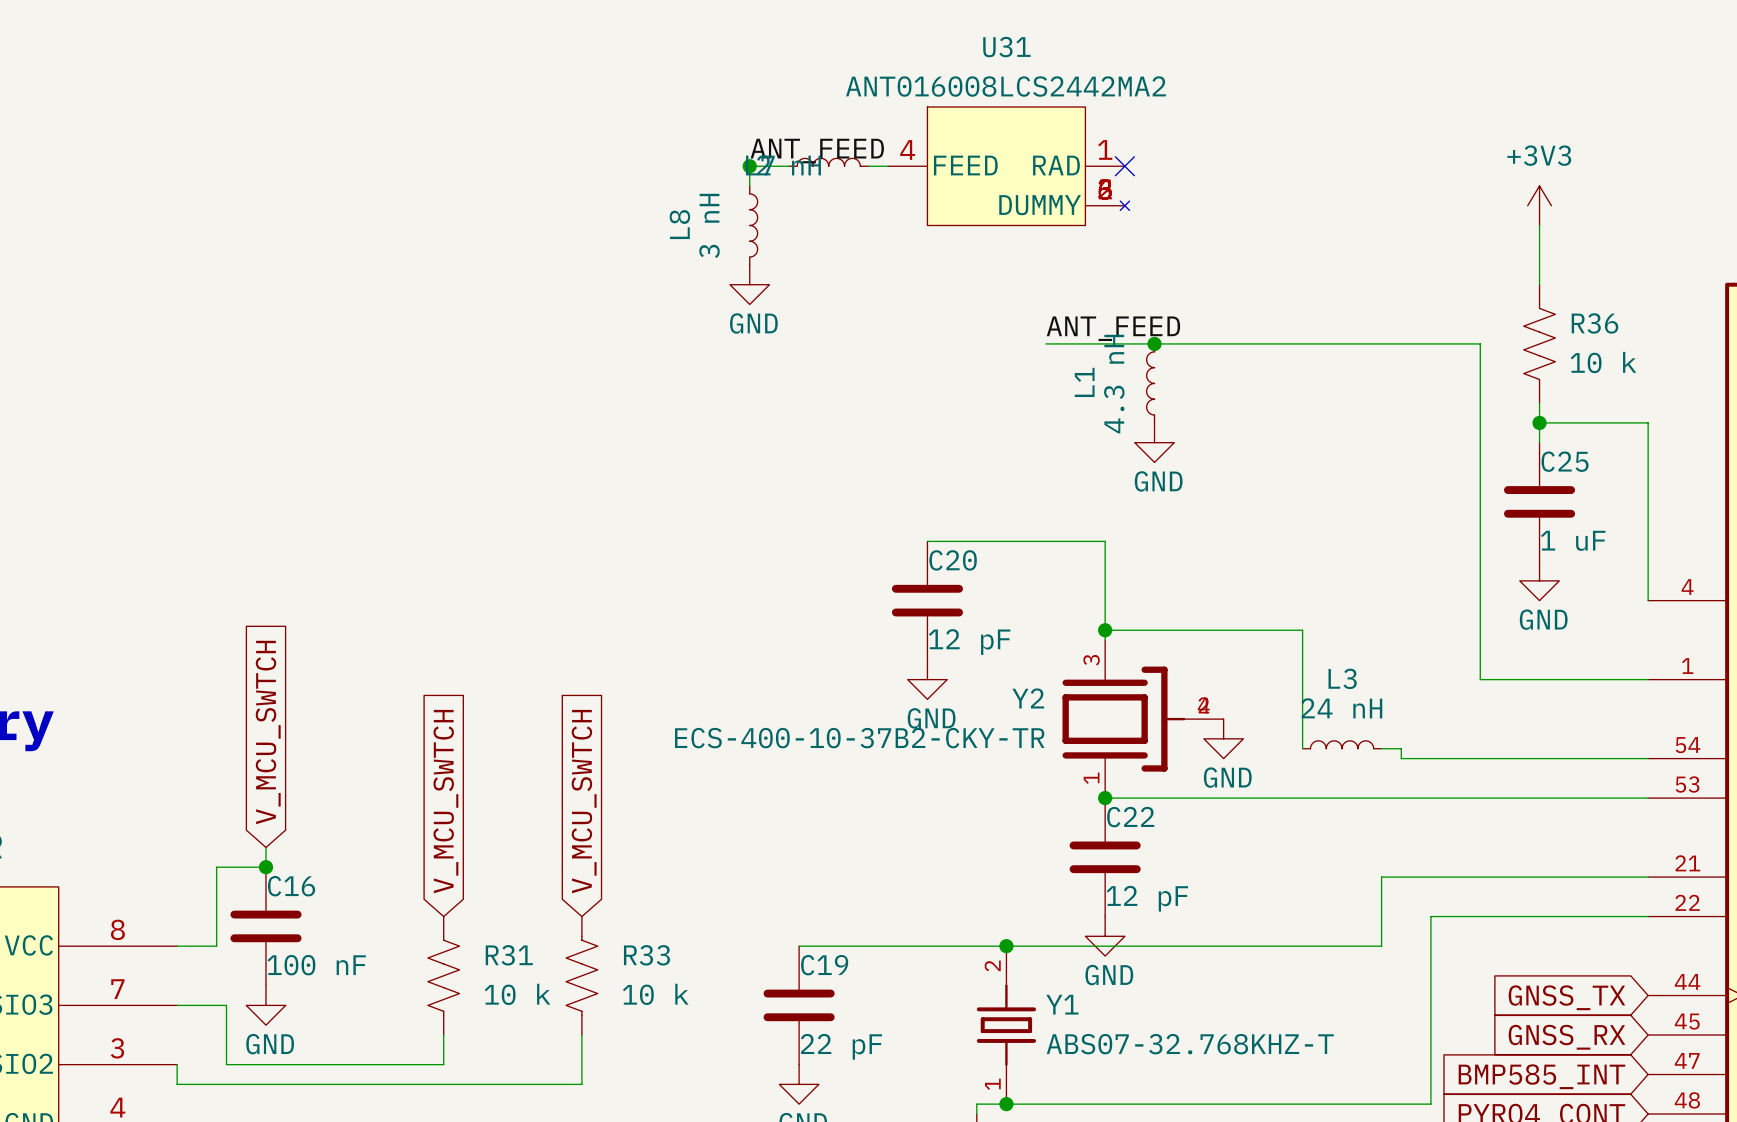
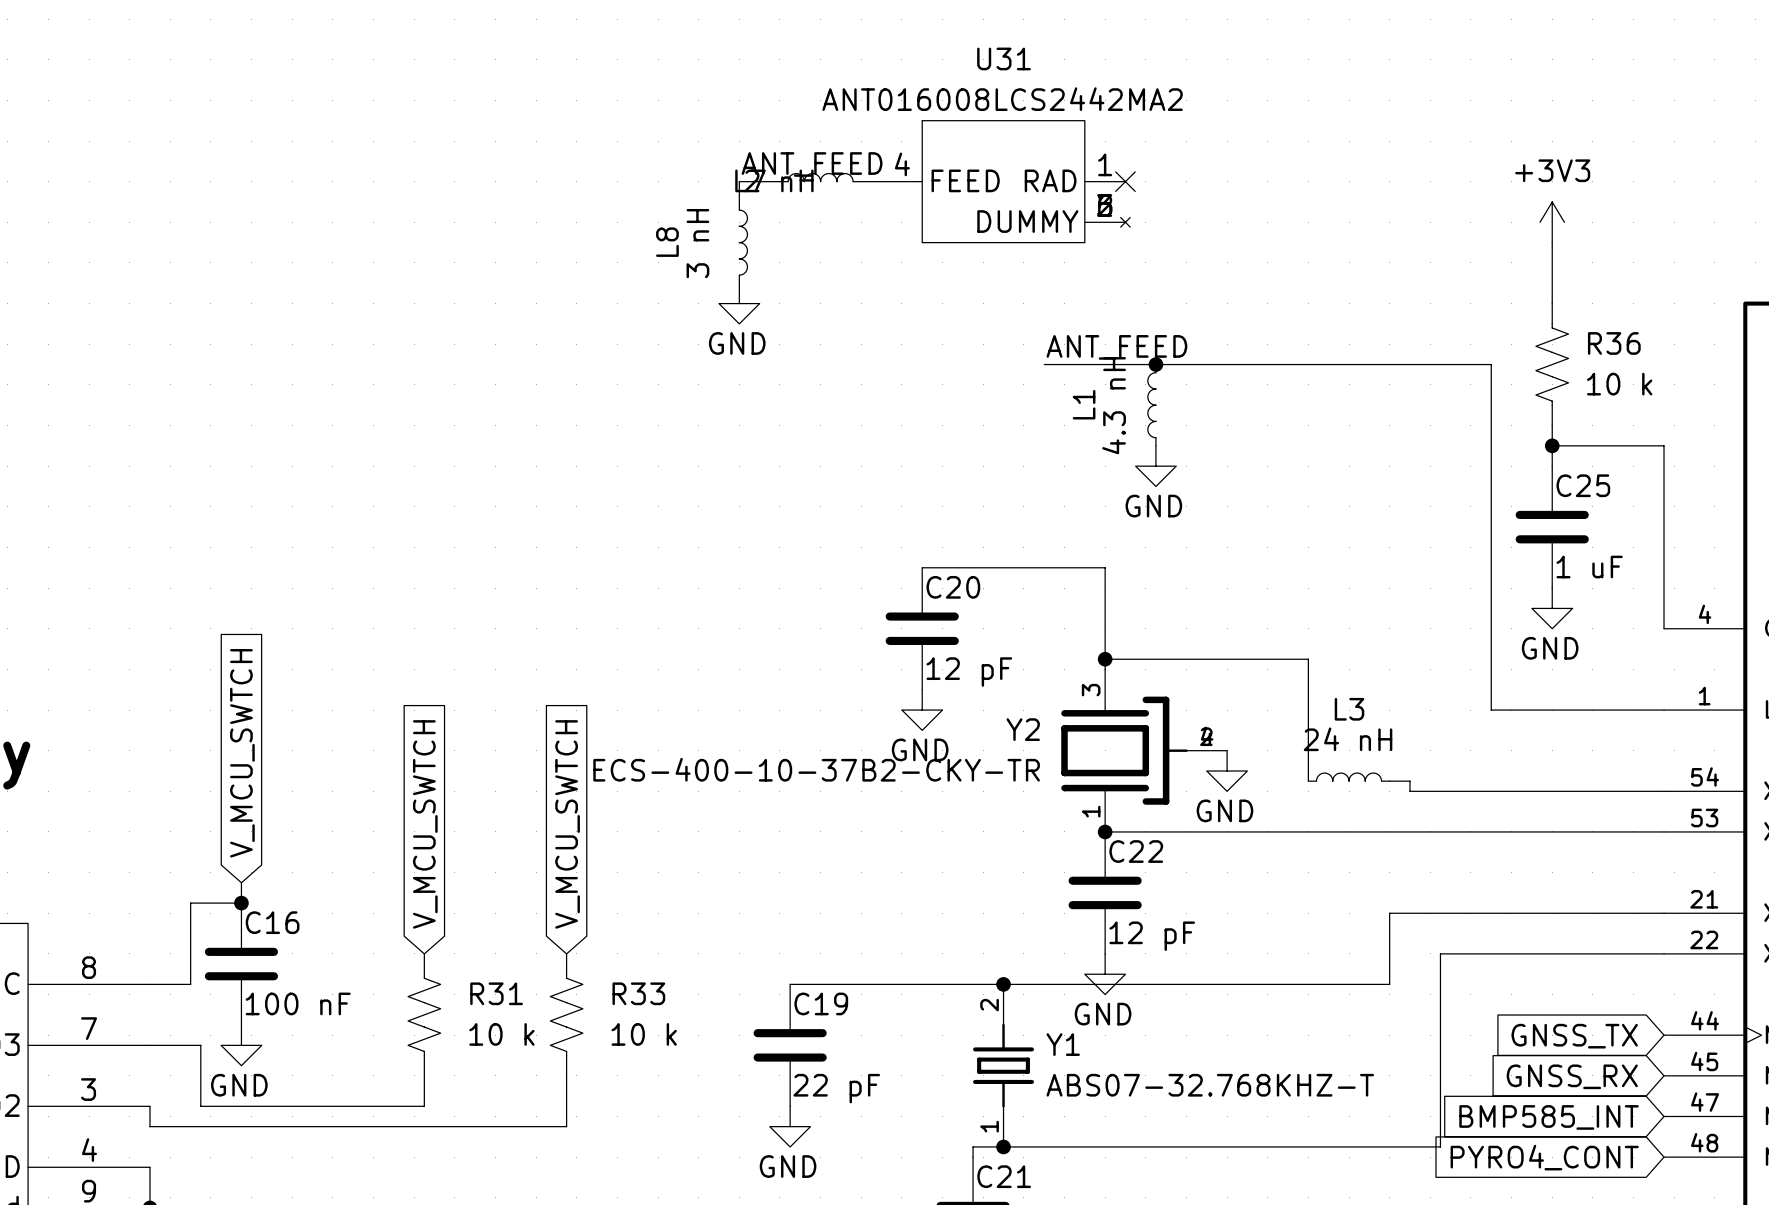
junction: (749, 166) -> none

